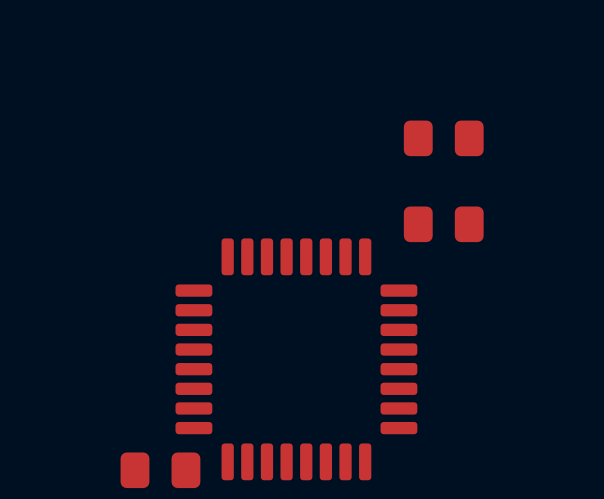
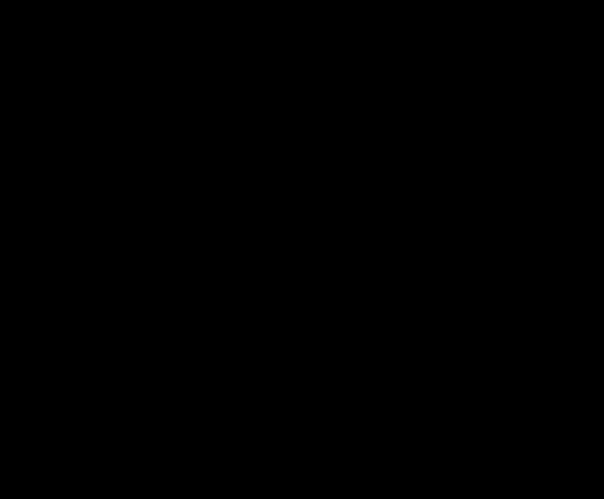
part: (443, 138) -> none
part: (443, 224) -> none
part: (296, 359) -> none
part: (160, 470) -> none

